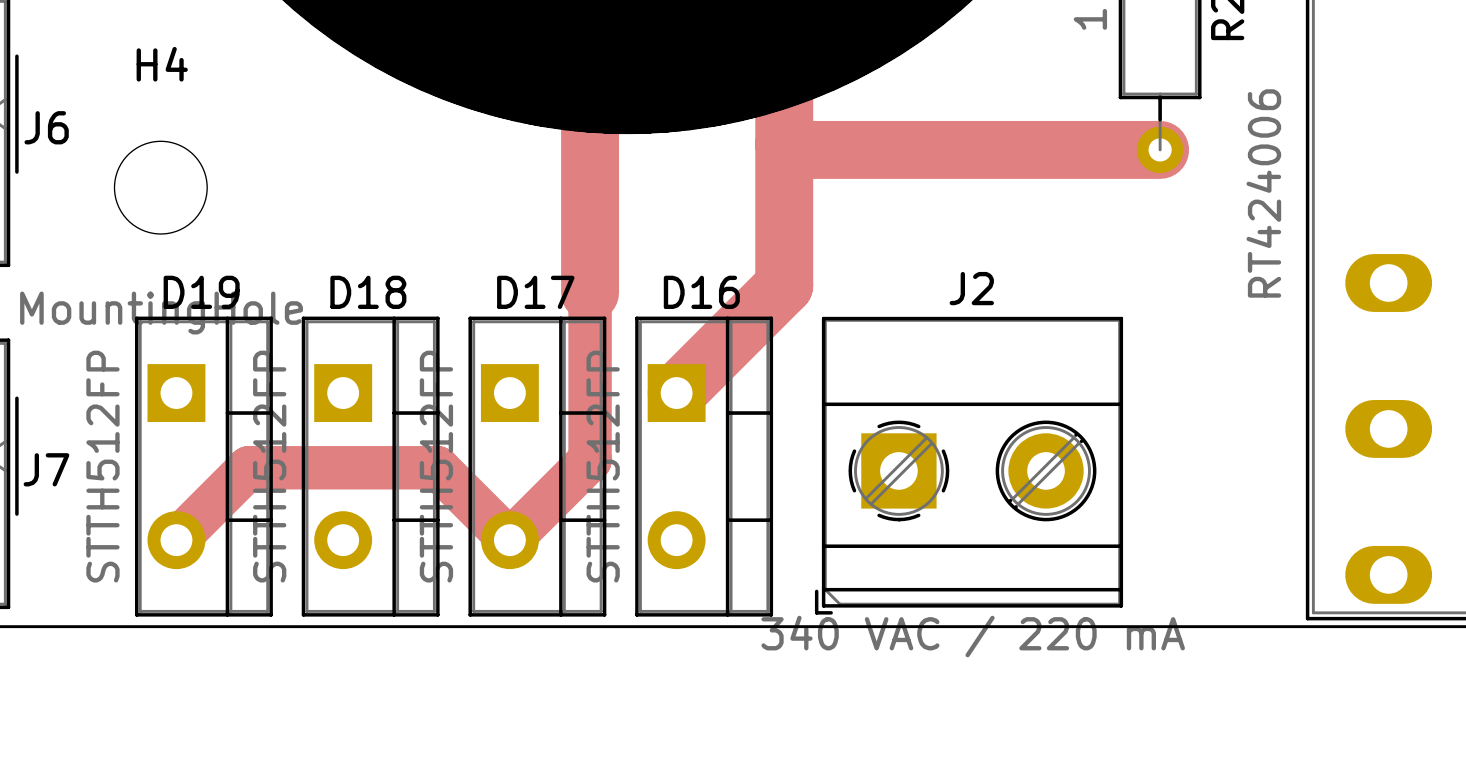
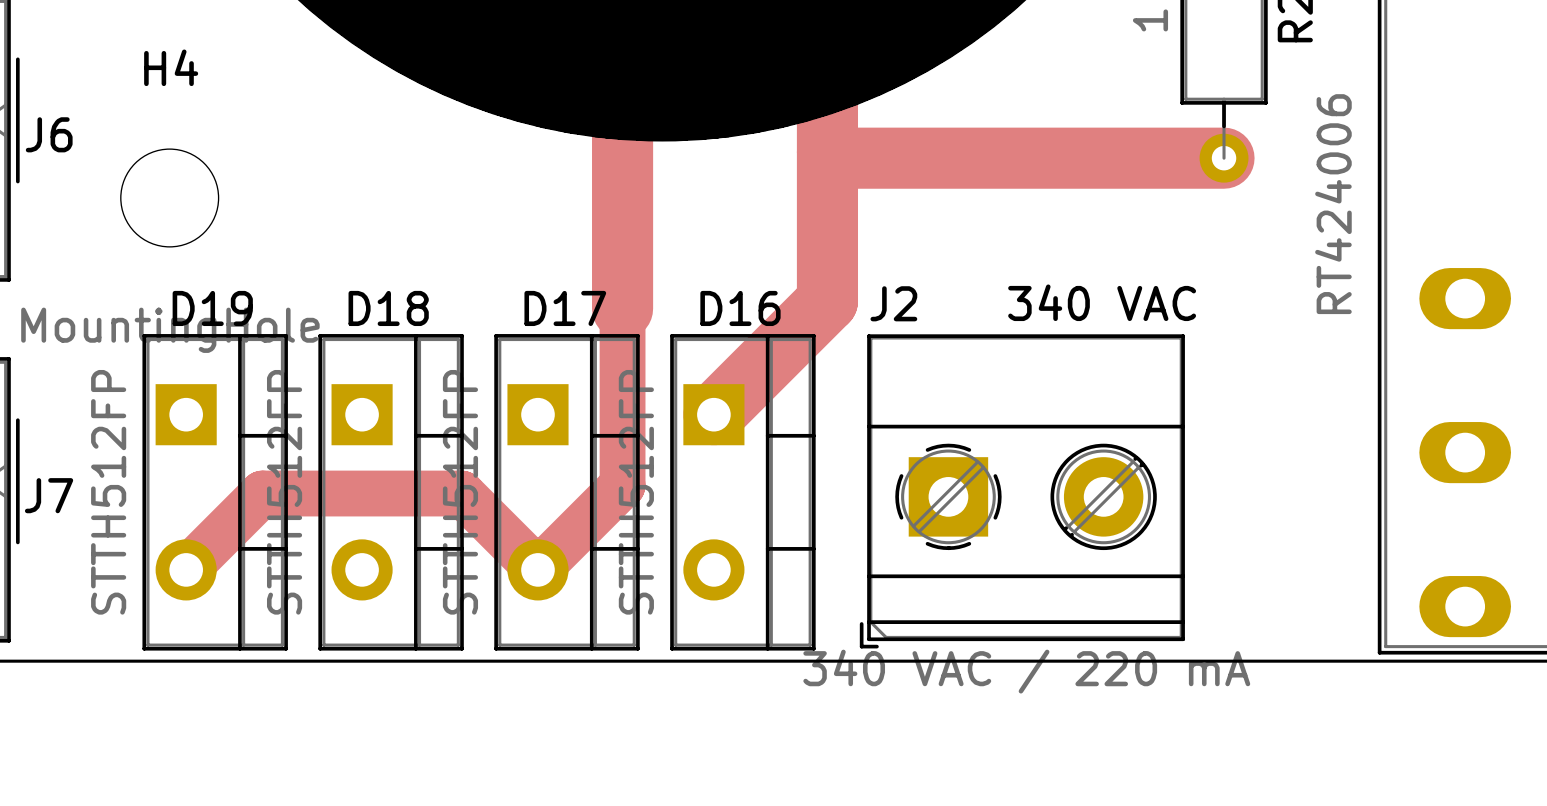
text: none -> 340 VAC (1102, 302)
J2 name position: J2 (971, 288) -> J2 (893, 303)

